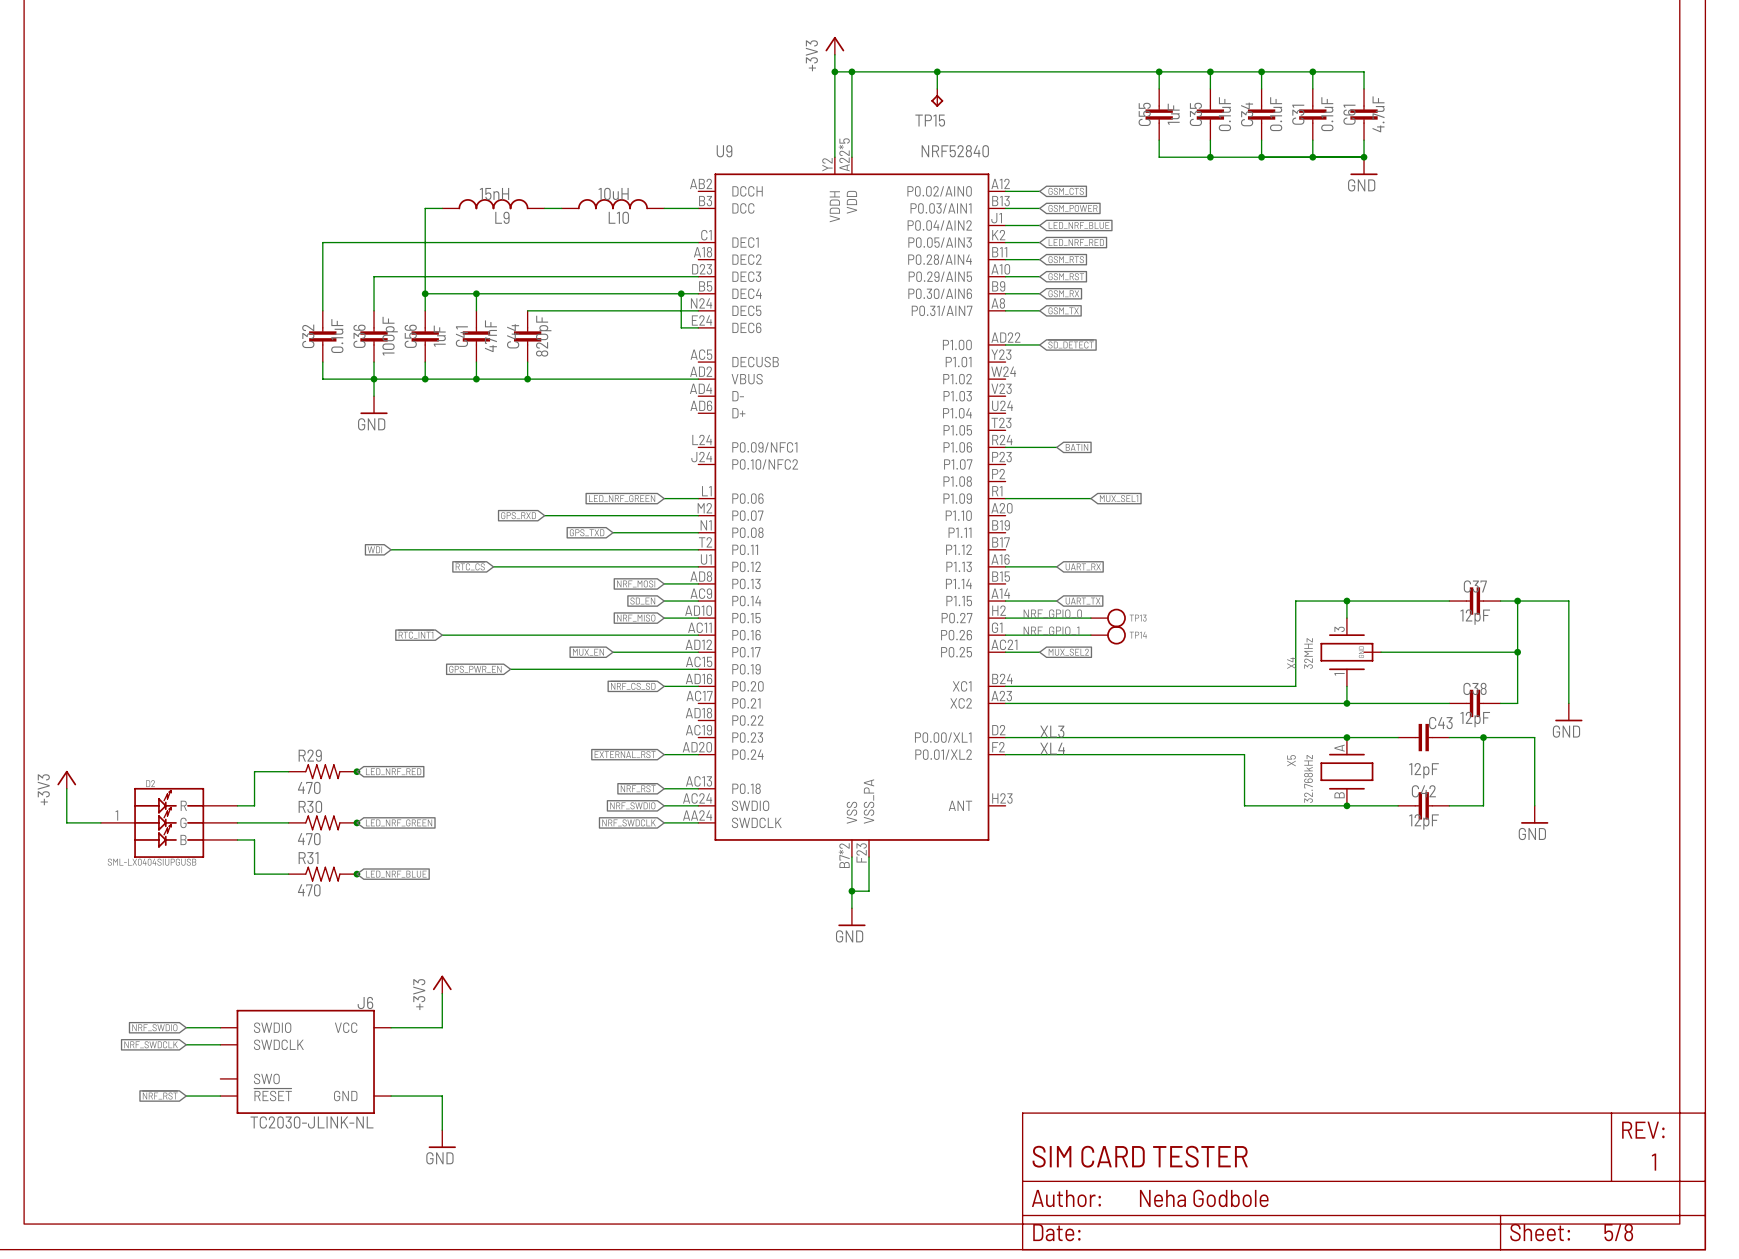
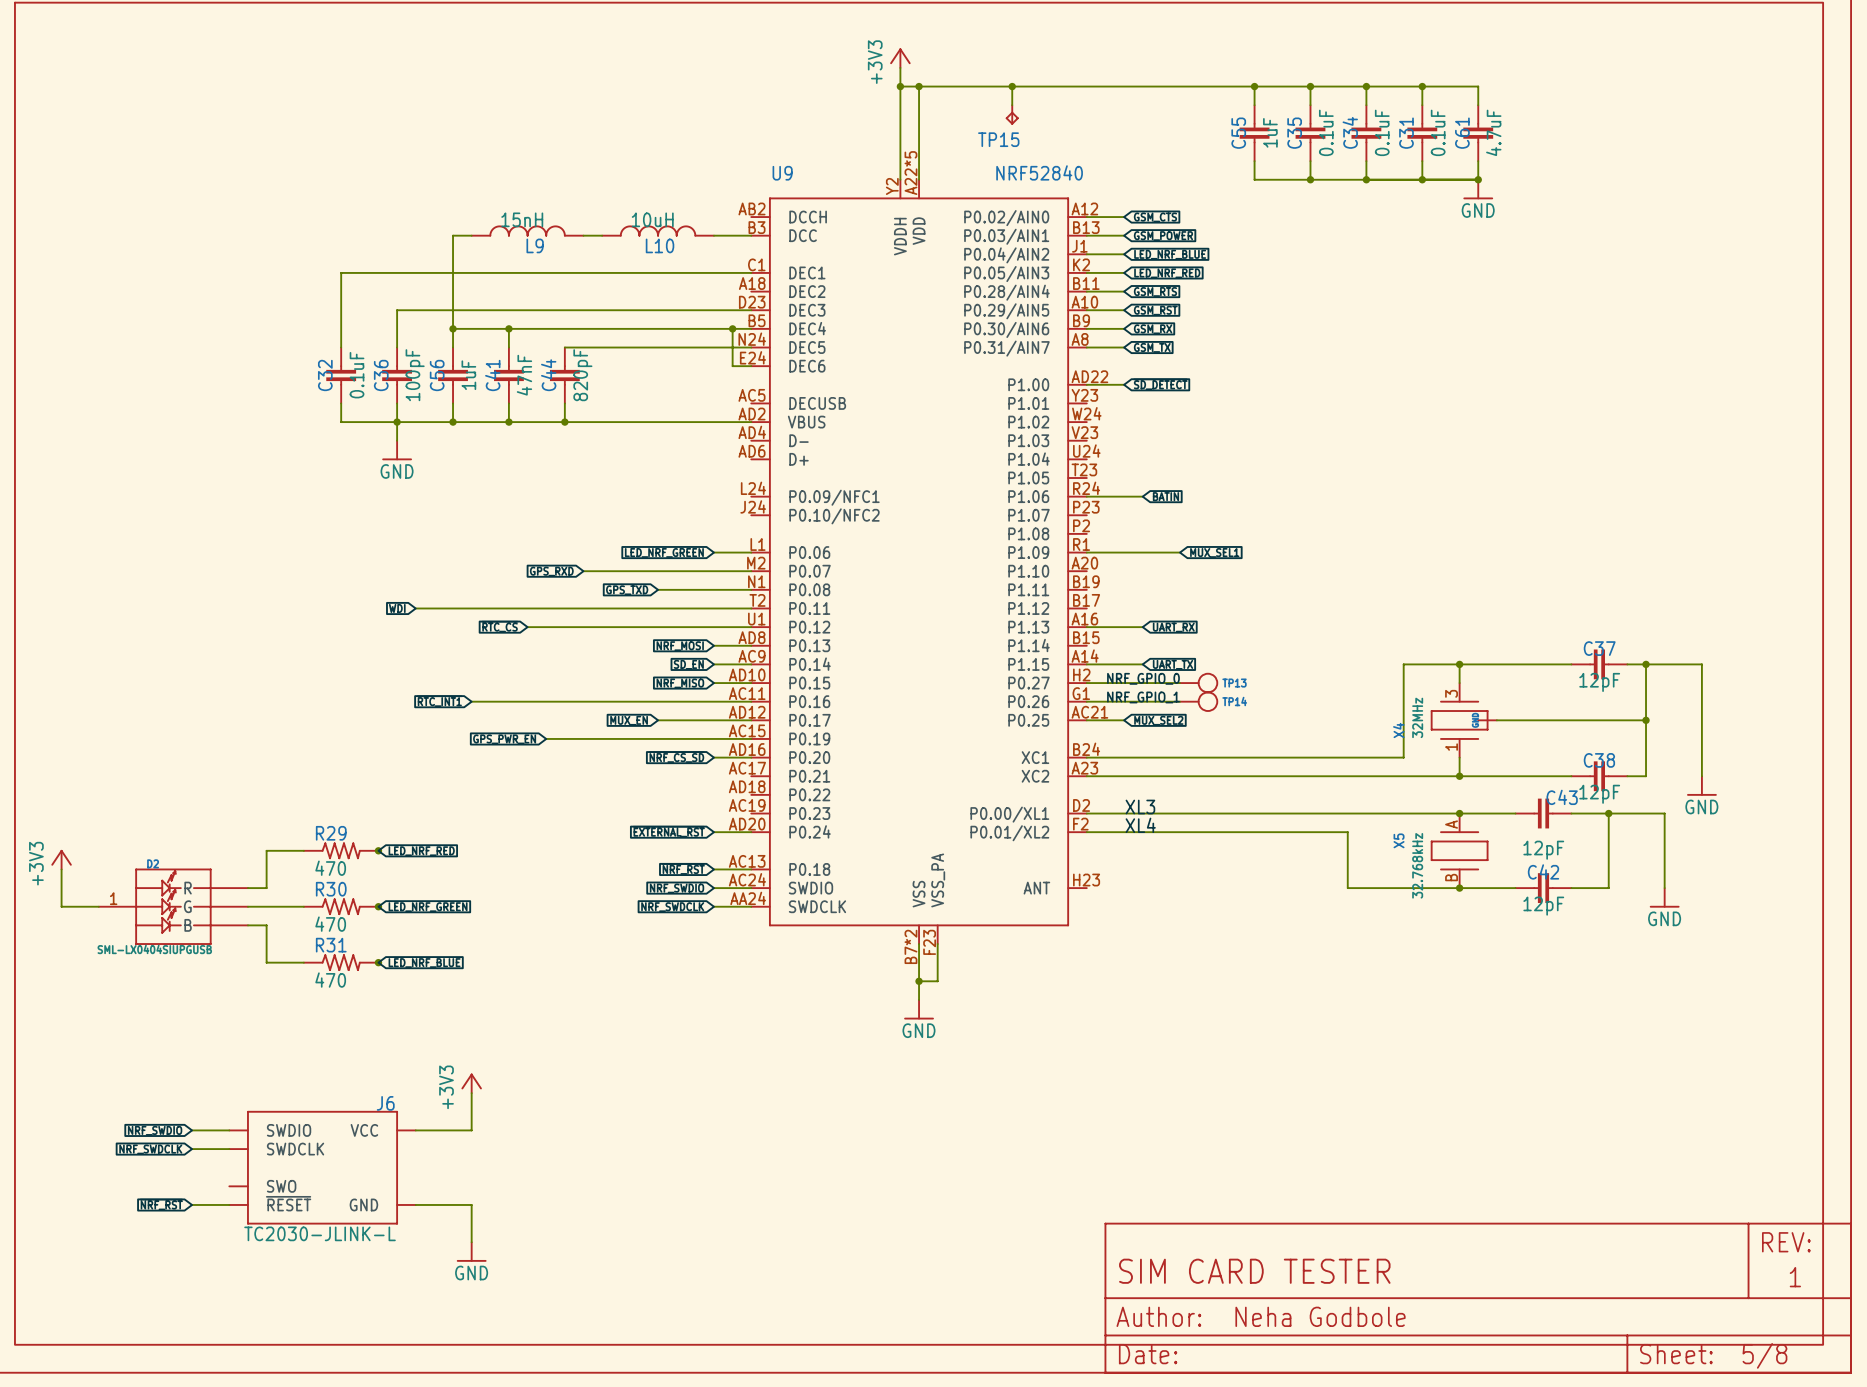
J6 value: TC2030-JLINK-NL (312, 1122) -> TC2030-JLINK-L (320, 1233)

